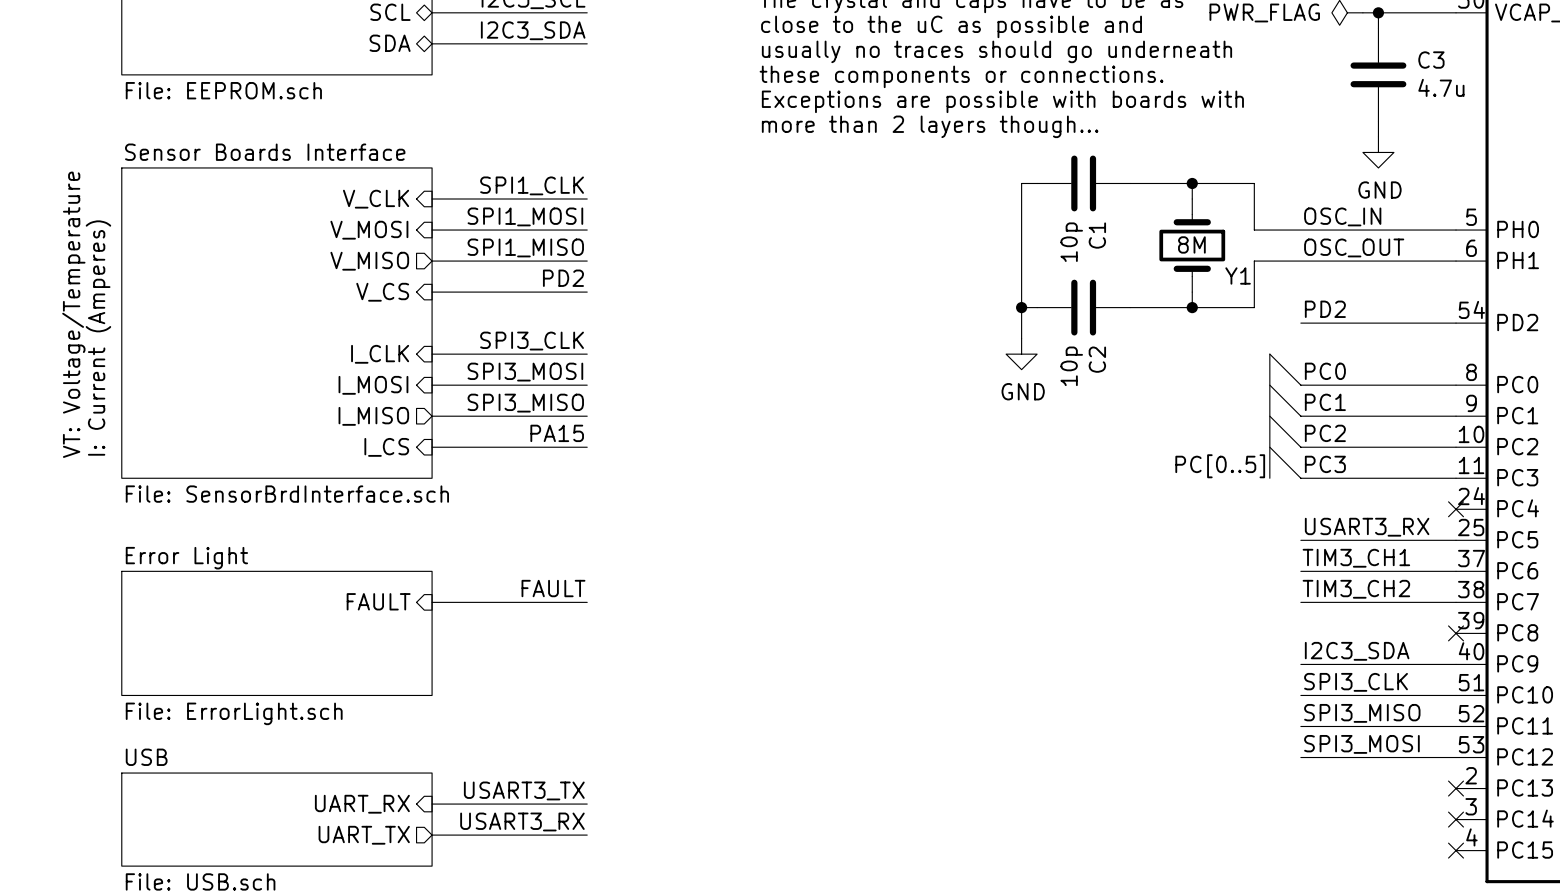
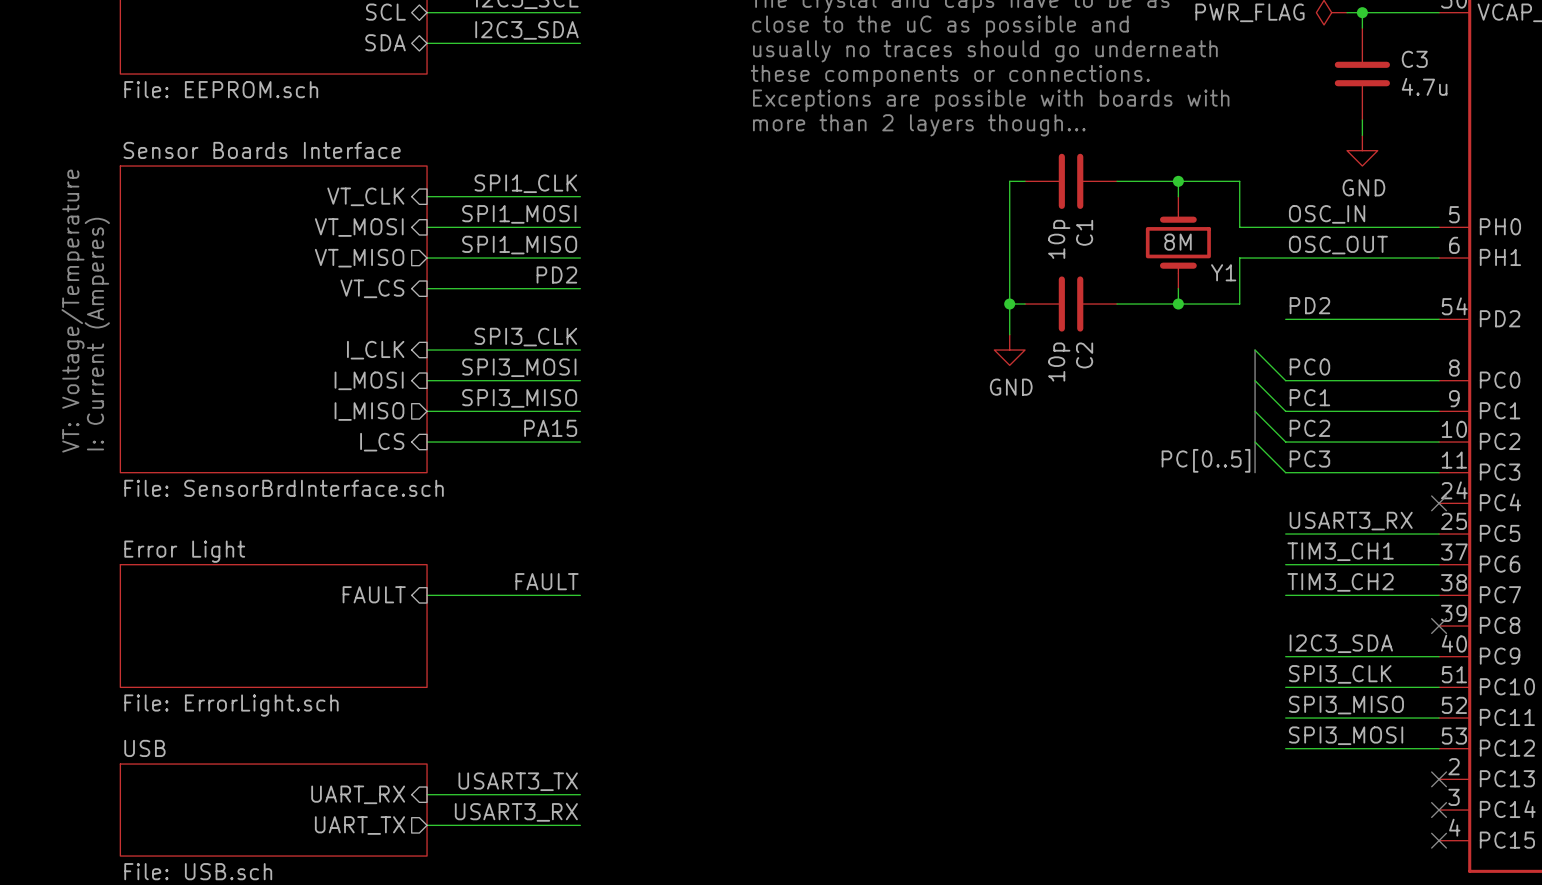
sheet pin: V_CLK (376, 199) -> VT_CLK (365, 196)
sheet pin: V_MOSI (369, 230) -> VT_MOSI (359, 227)
sheet pin: V_MISO (369, 261) -> VT_MISO (359, 258)
sheet pin: V_CS (382, 292) -> VT_CS (372, 288)

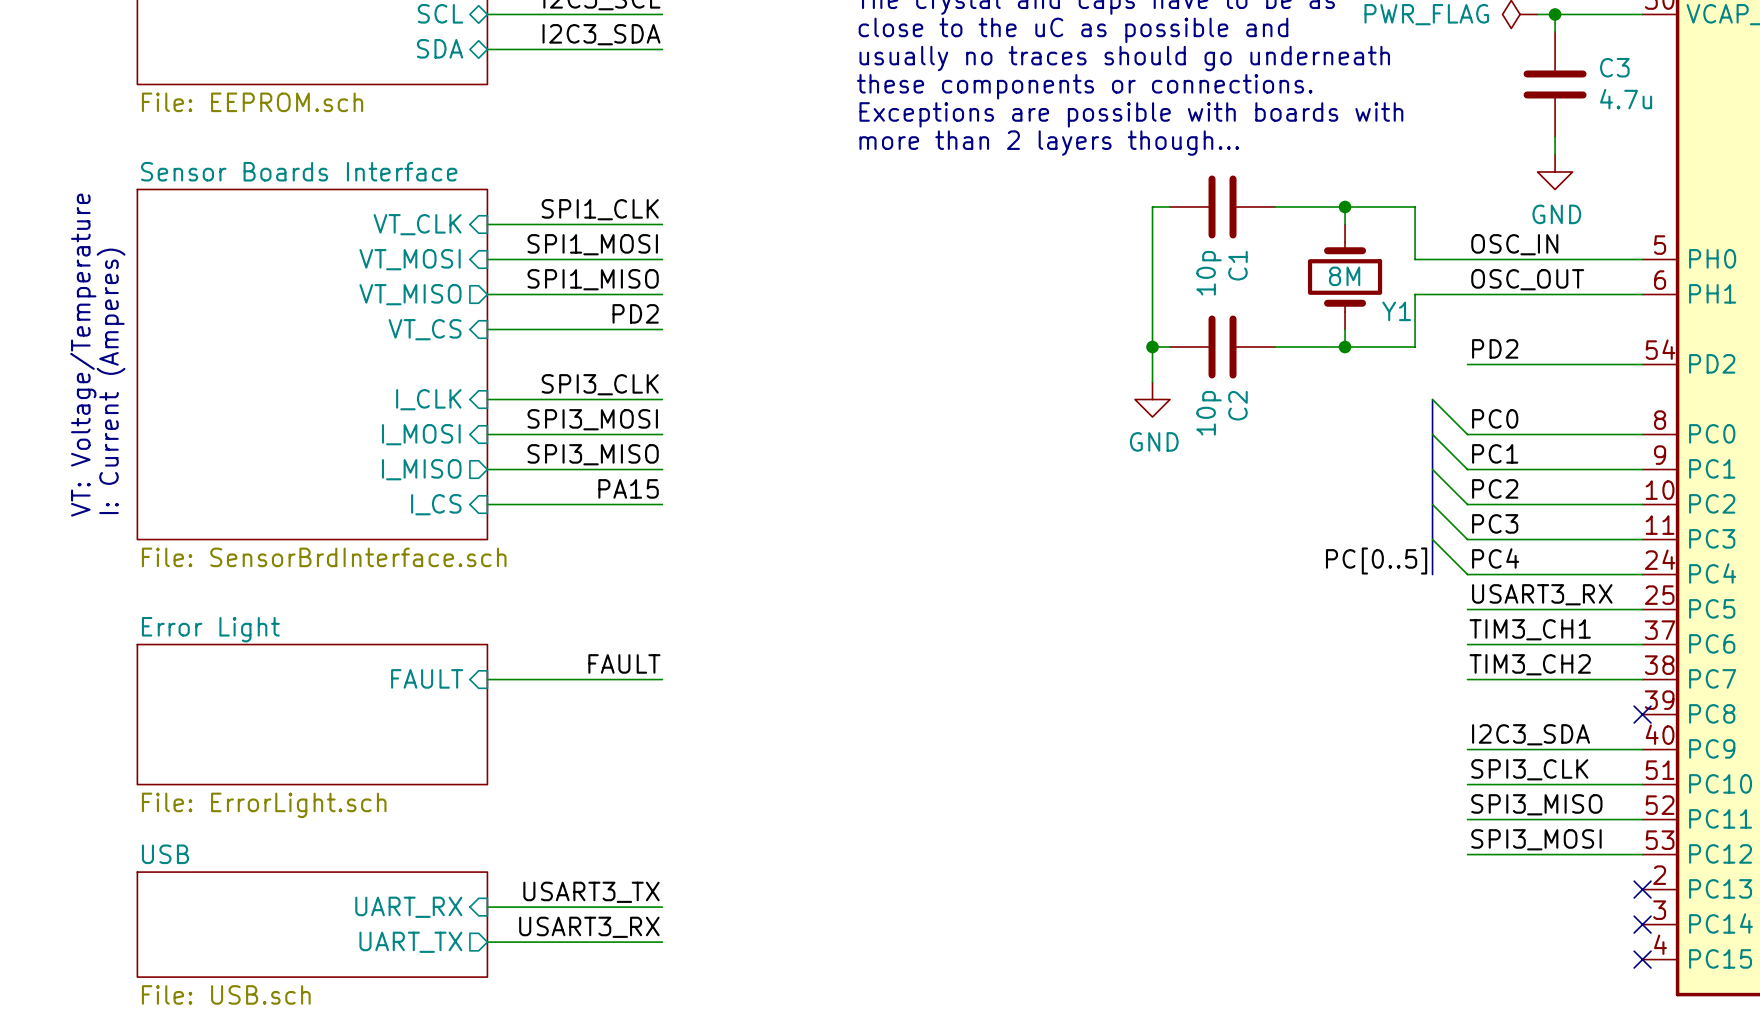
label position: PC[0..5] (1206, 460) -> PC[0..5] (1376, 561)
wire: none -> (1432, 539) (1467, 574) (1642, 574)
bus: none -> (1432, 539) (1432, 574)
label: none -> PC4 (1495, 558)
no-connect mark: (1439, 503) -> none

